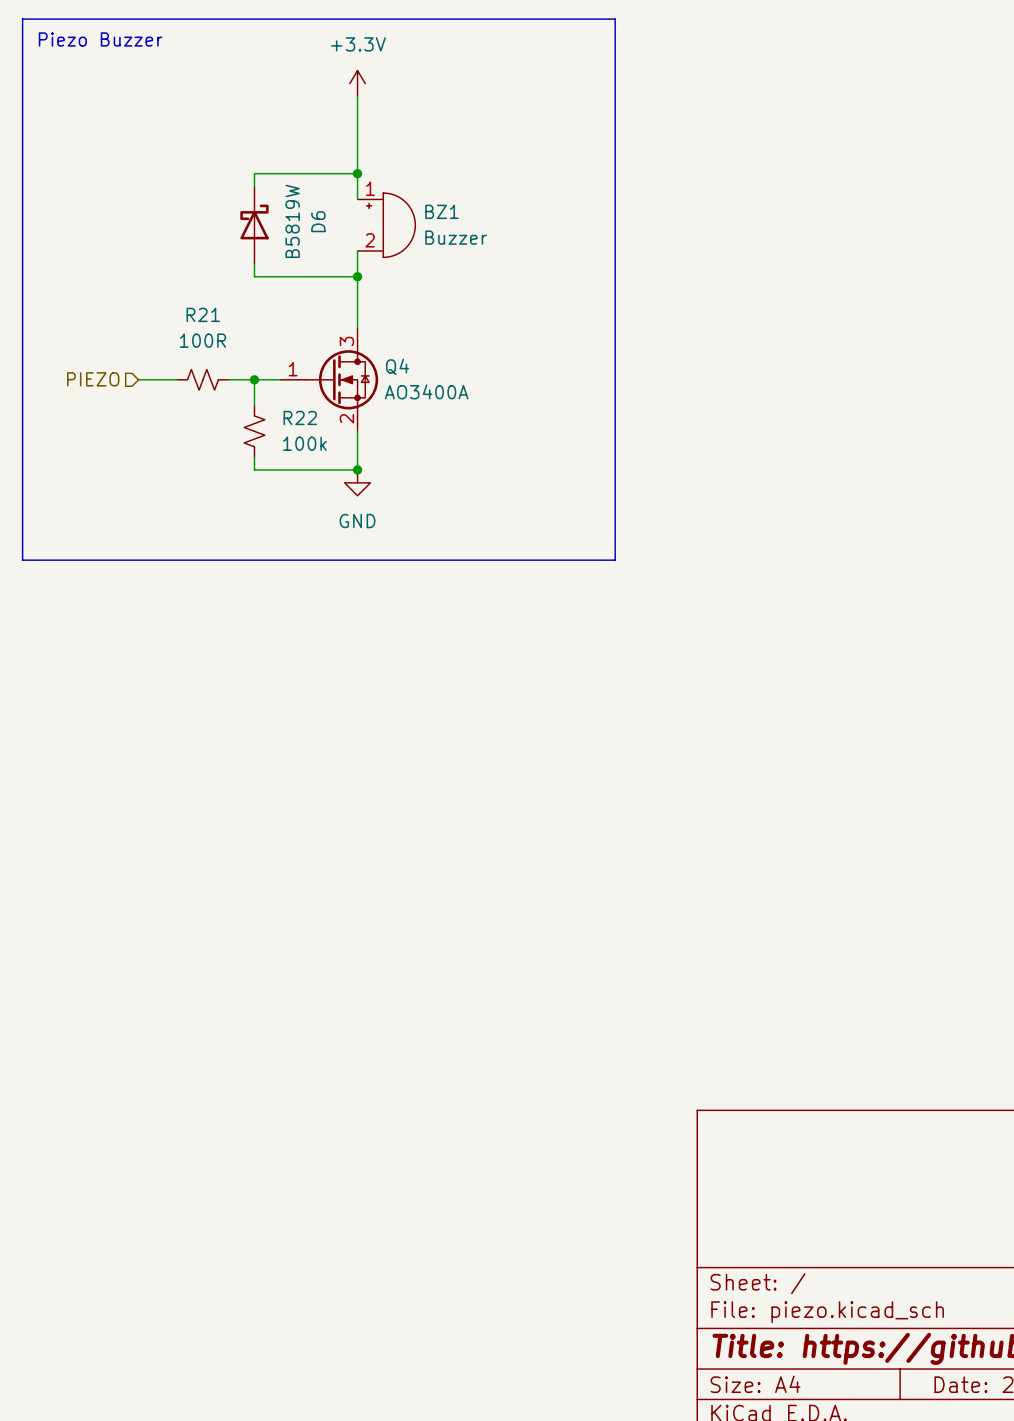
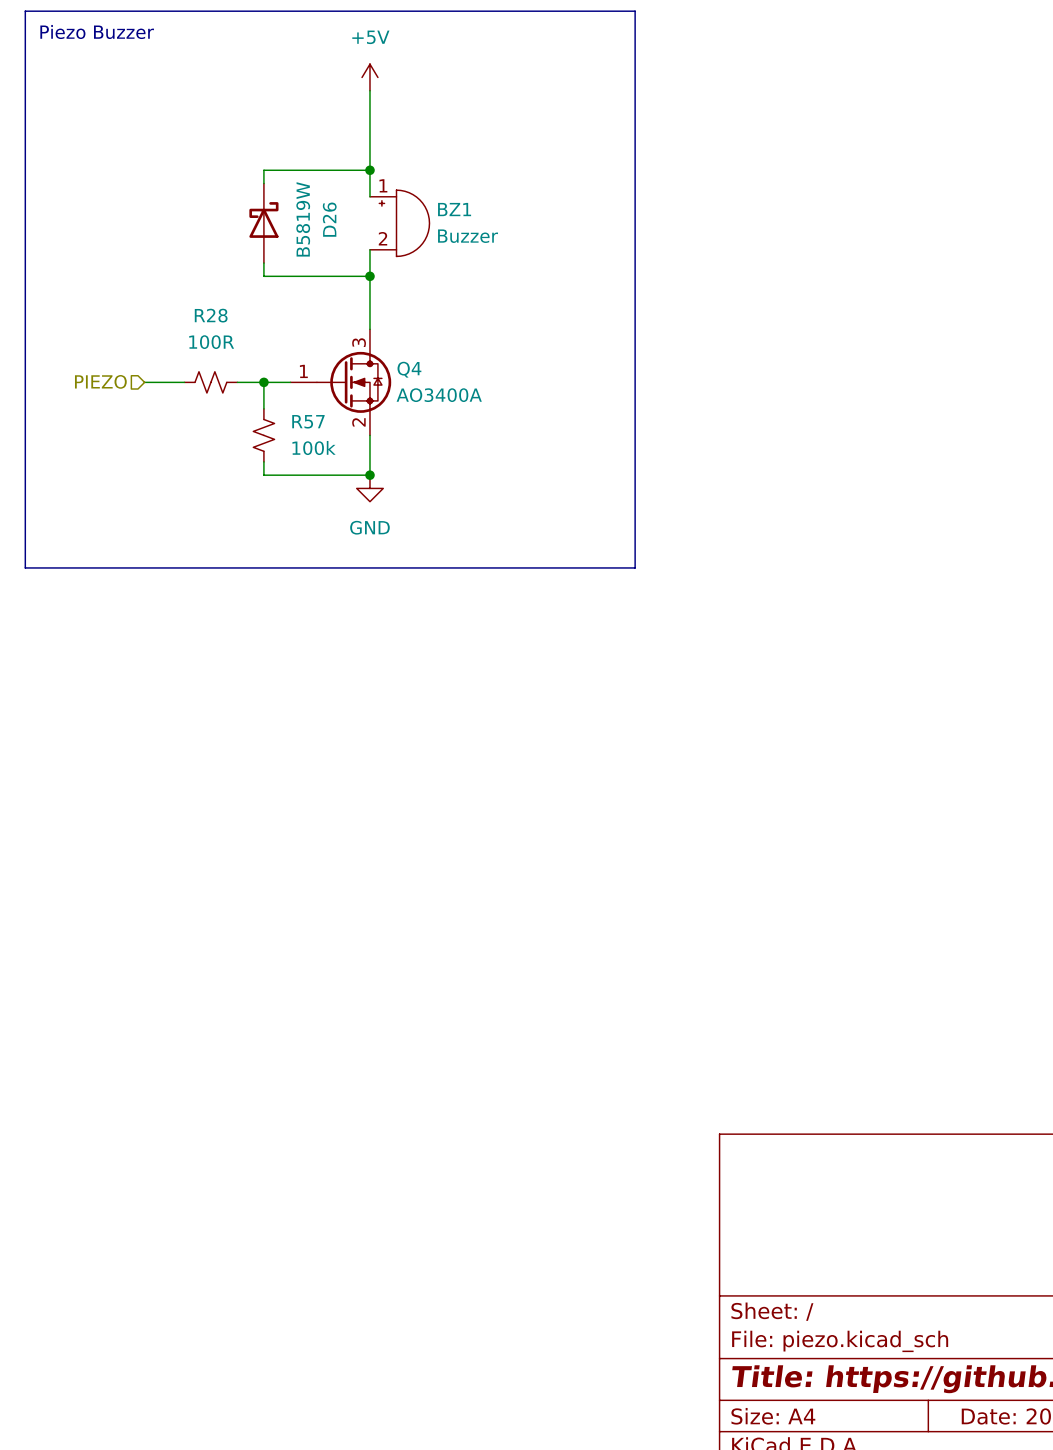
power symbol: +3.3V (357, 83) -> +5V (369, 77)
D6 name: D6 (318, 221) -> D26 (329, 219)
R21 name: R21 (203, 314) -> R28 (211, 315)
R22 name: R22 (300, 417) -> R57 (308, 421)

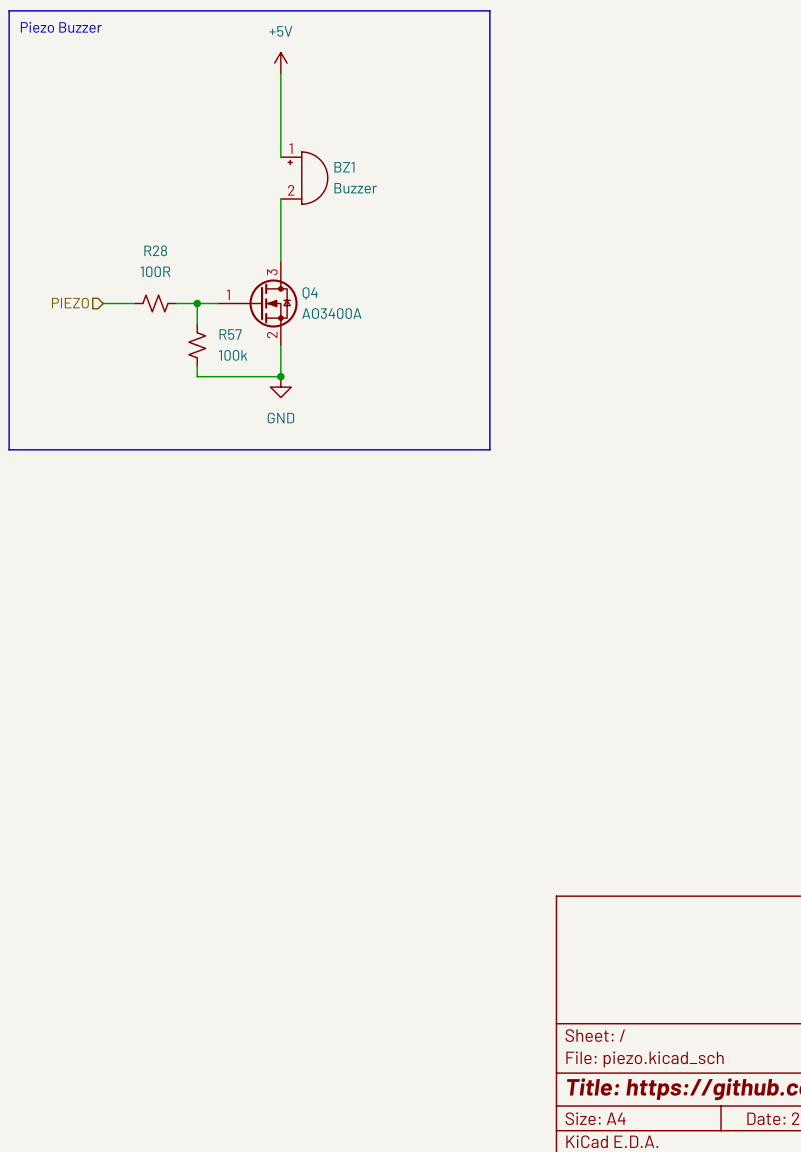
wire: (369, 170) (263, 170) (263, 183) -> none
junction: (369, 170) -> none
D26: B5819W (263, 223) -> none
wire: (263, 263) (263, 276) (369, 276) -> none
junction: (369, 276) -> none

